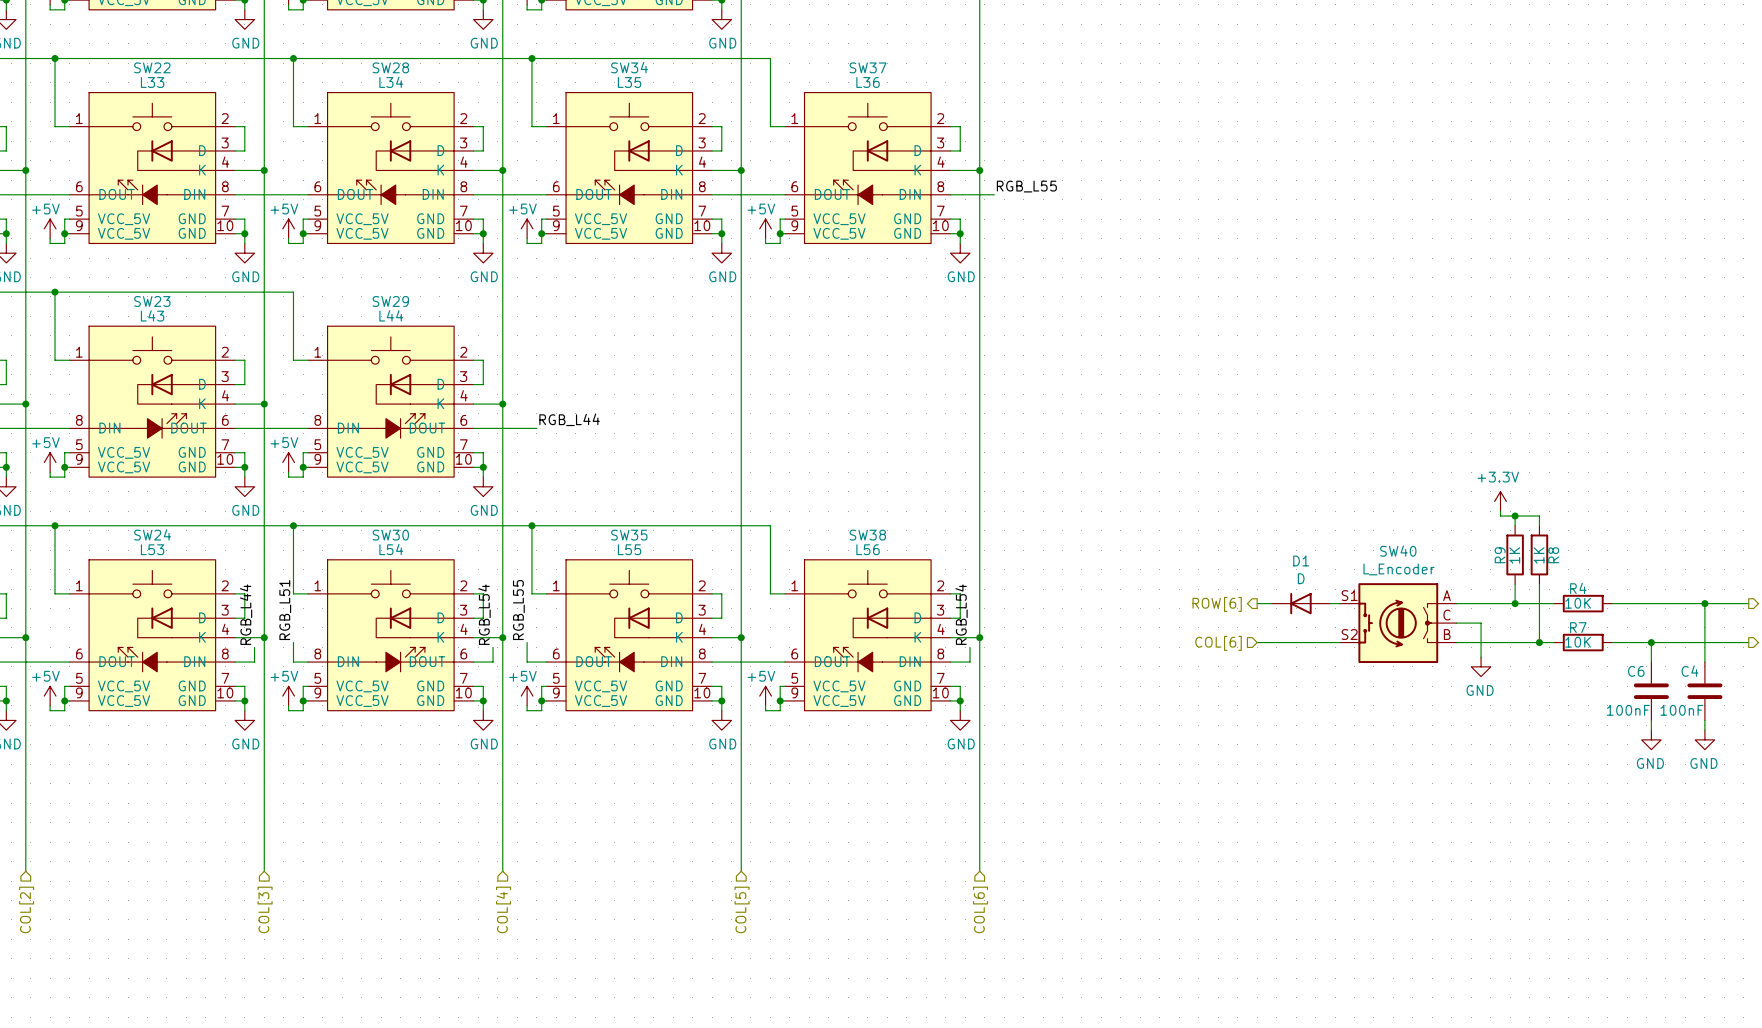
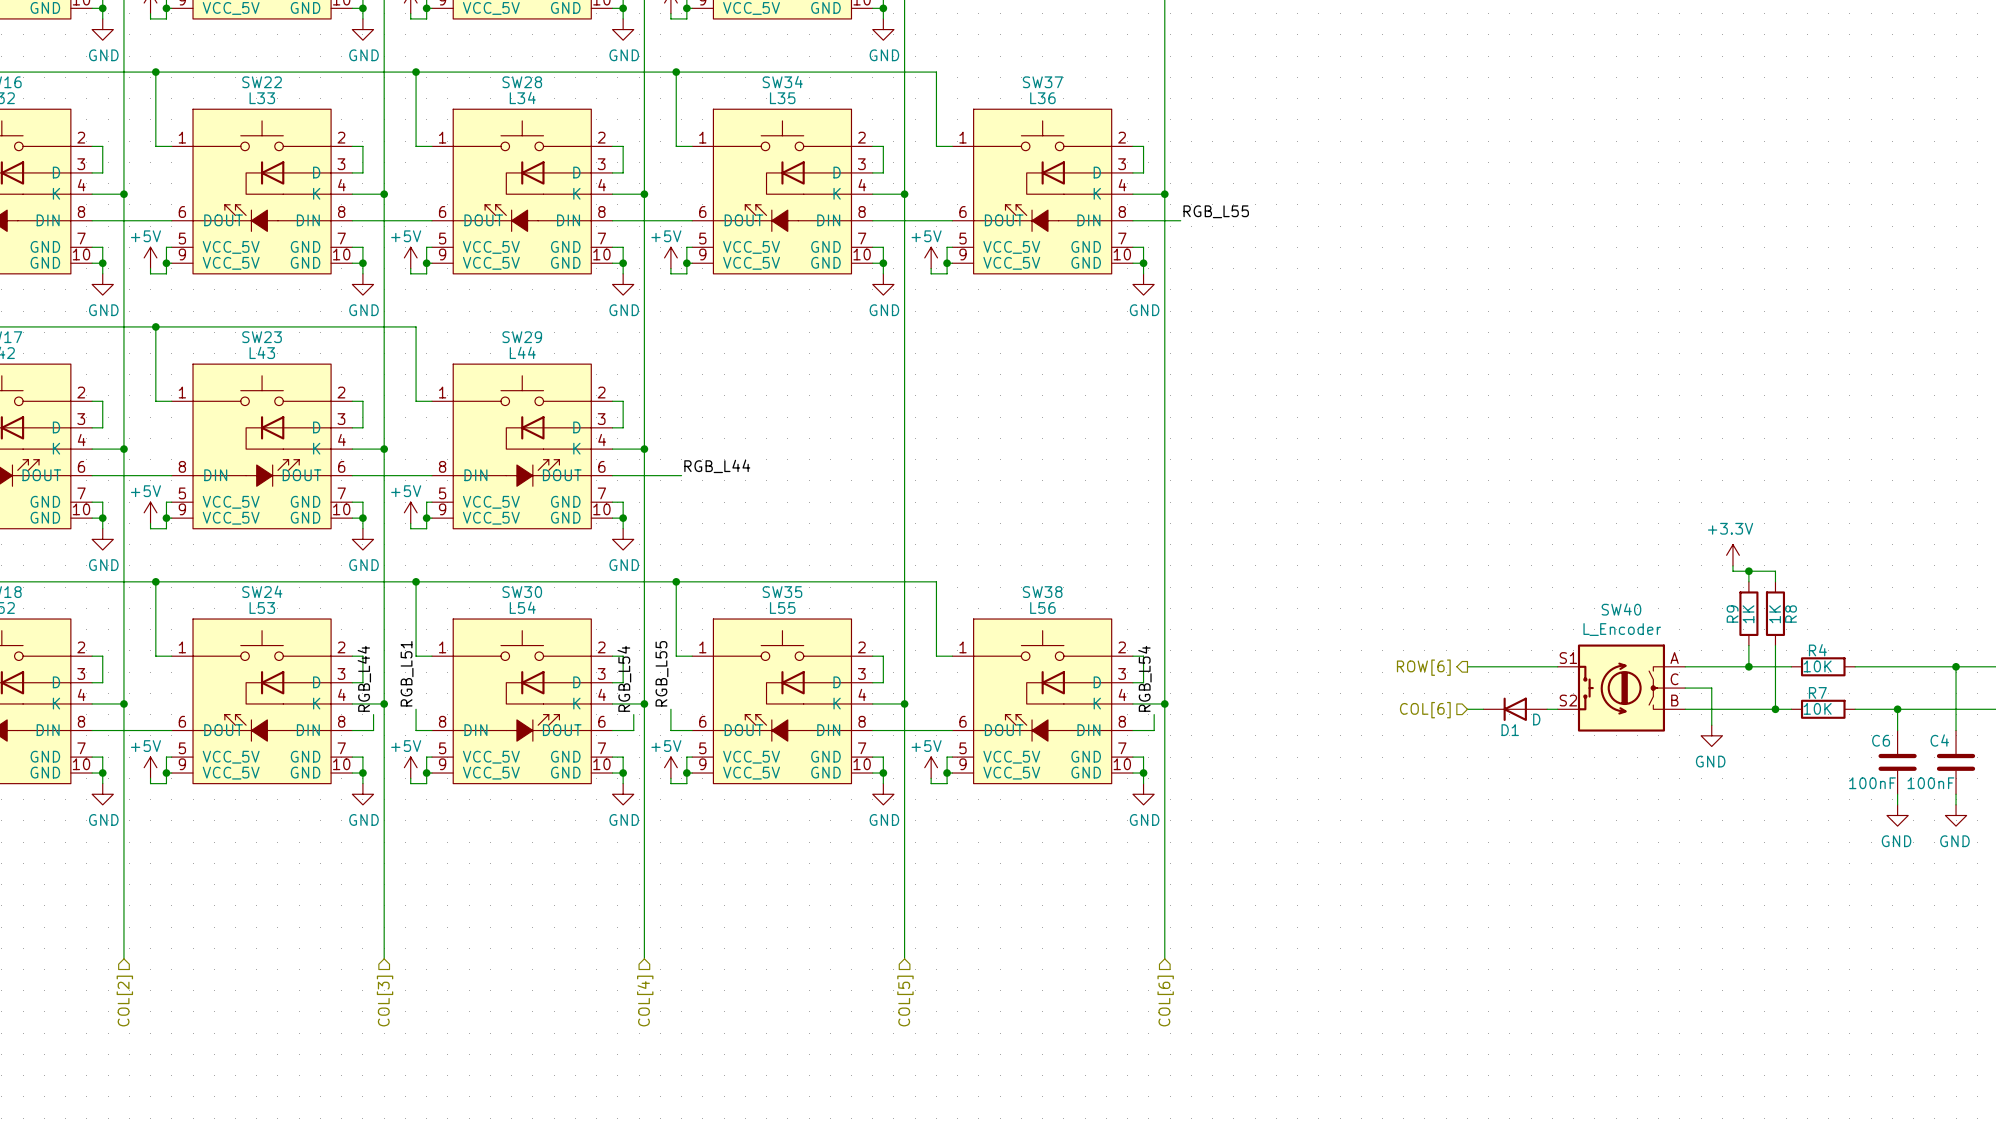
D1 name position: D1 (1301, 561) -> D1 (1510, 730)
D1 value position: D (1301, 578) -> D (1536, 719)
D1 position: (1300, 603) -> (1515, 709)

